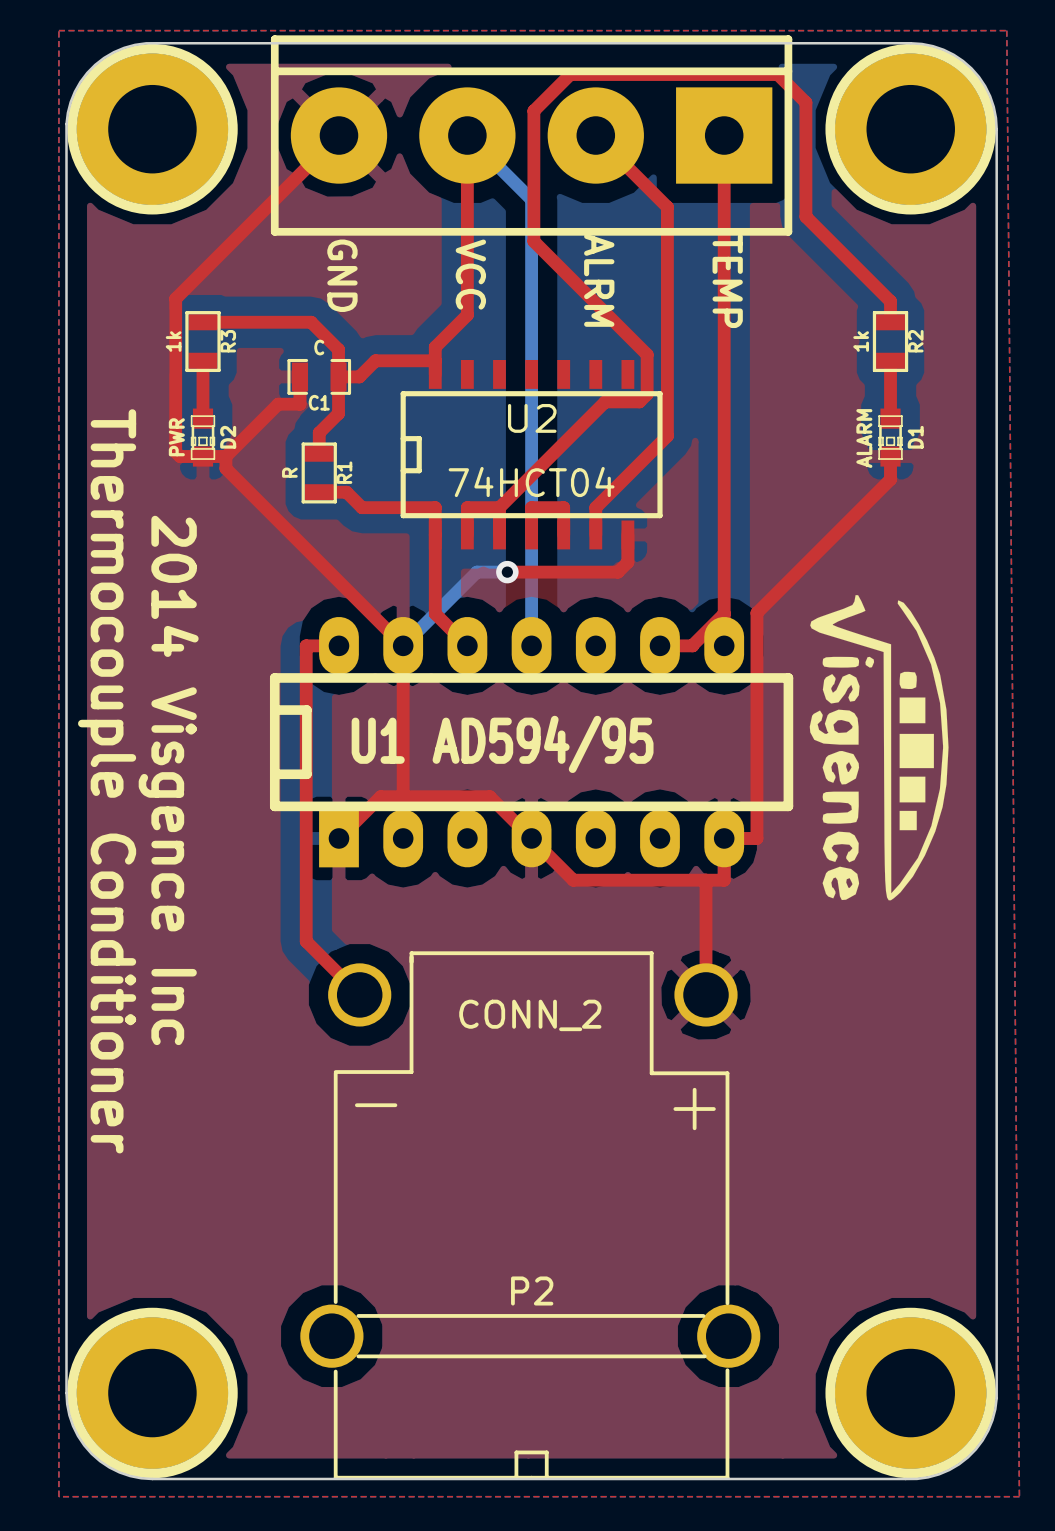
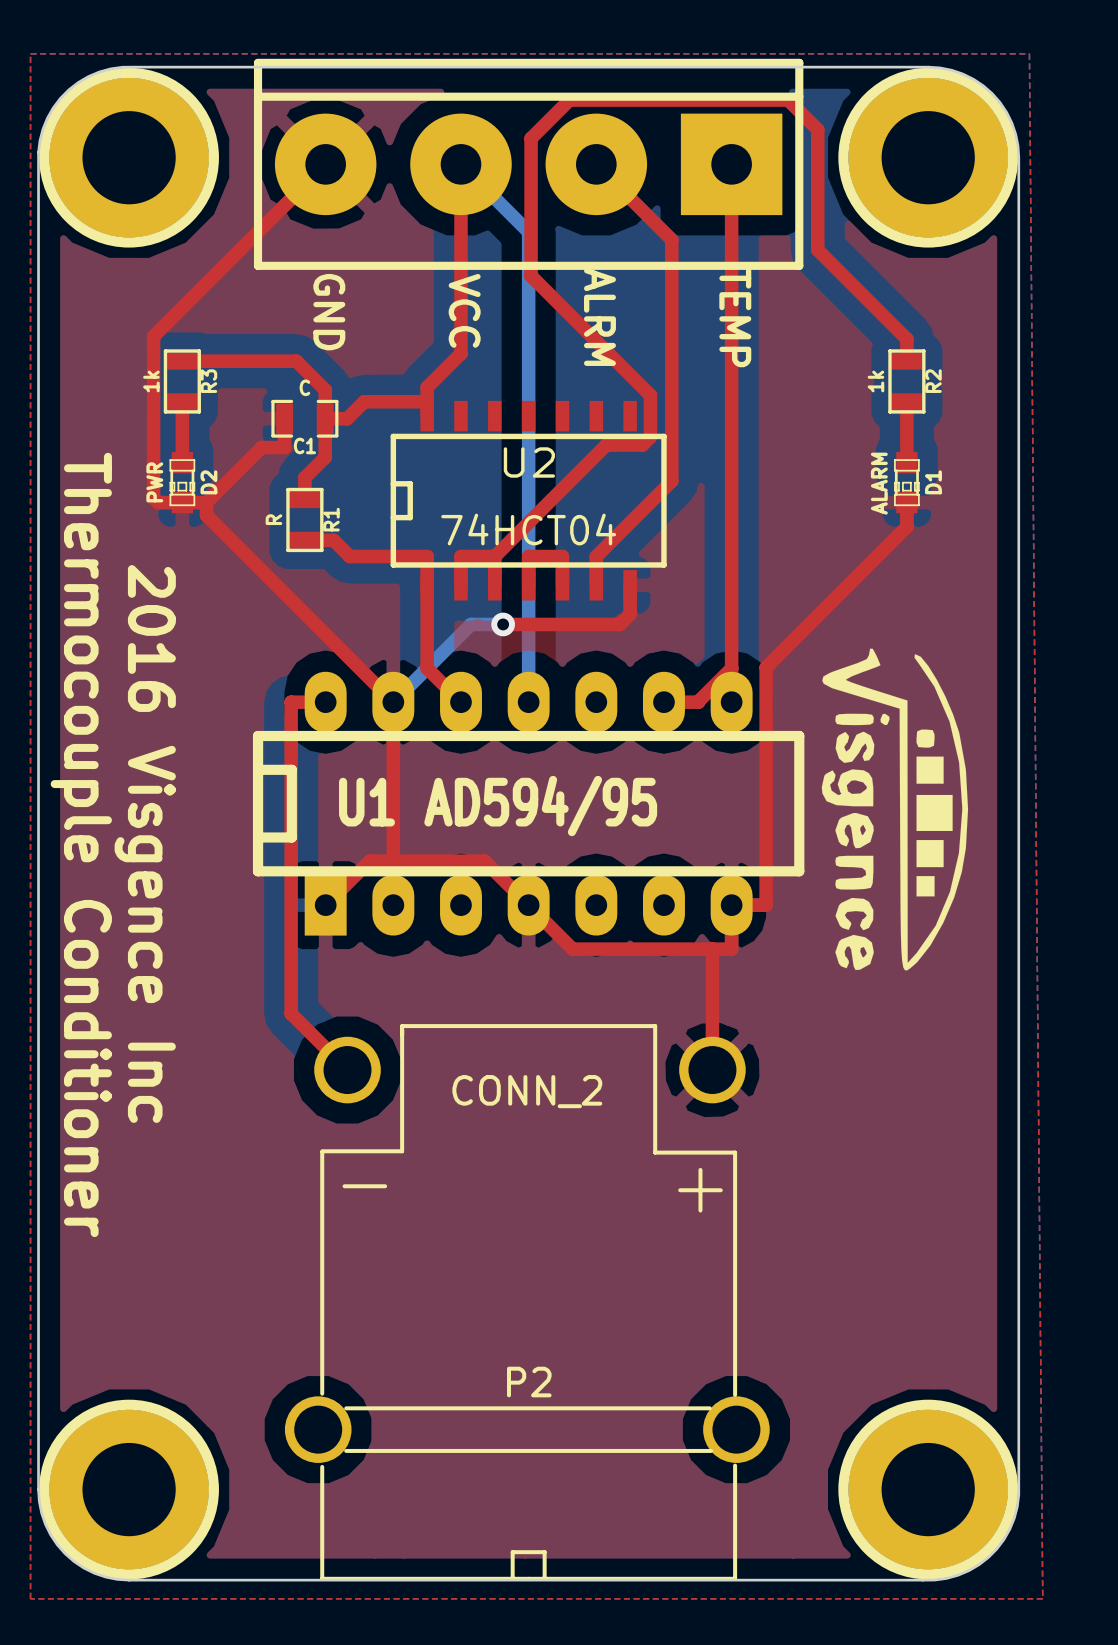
text: 2014 Visgence Inc (168, 780) -> 2016 Visgence Inc (145, 843)

